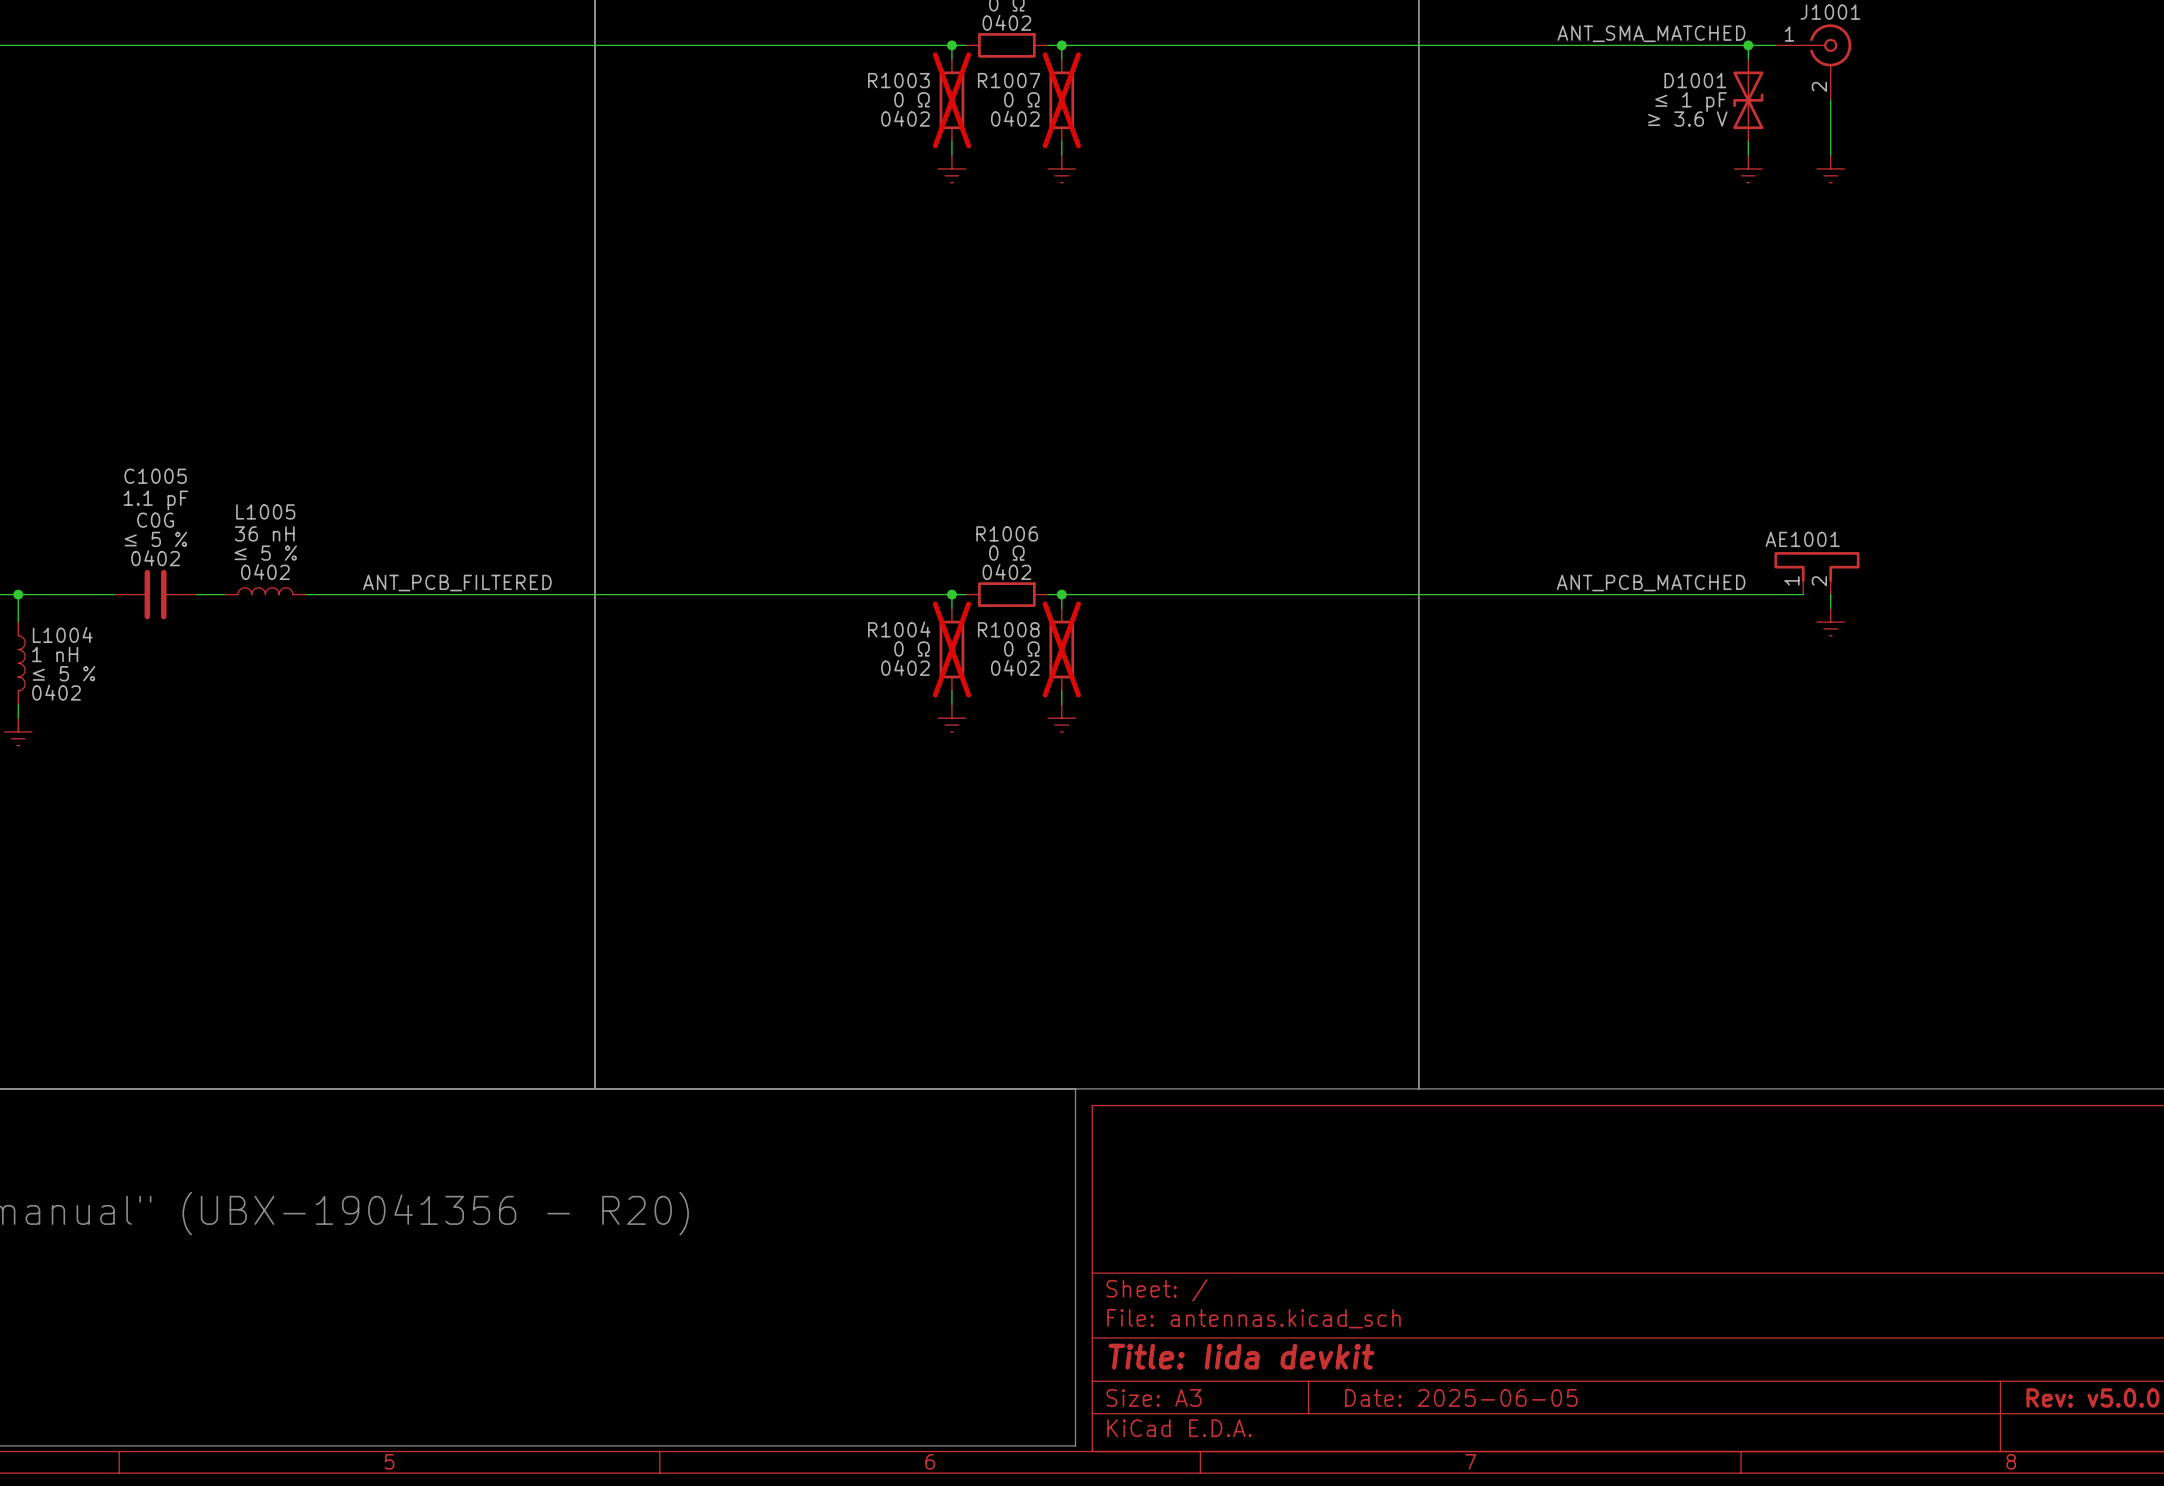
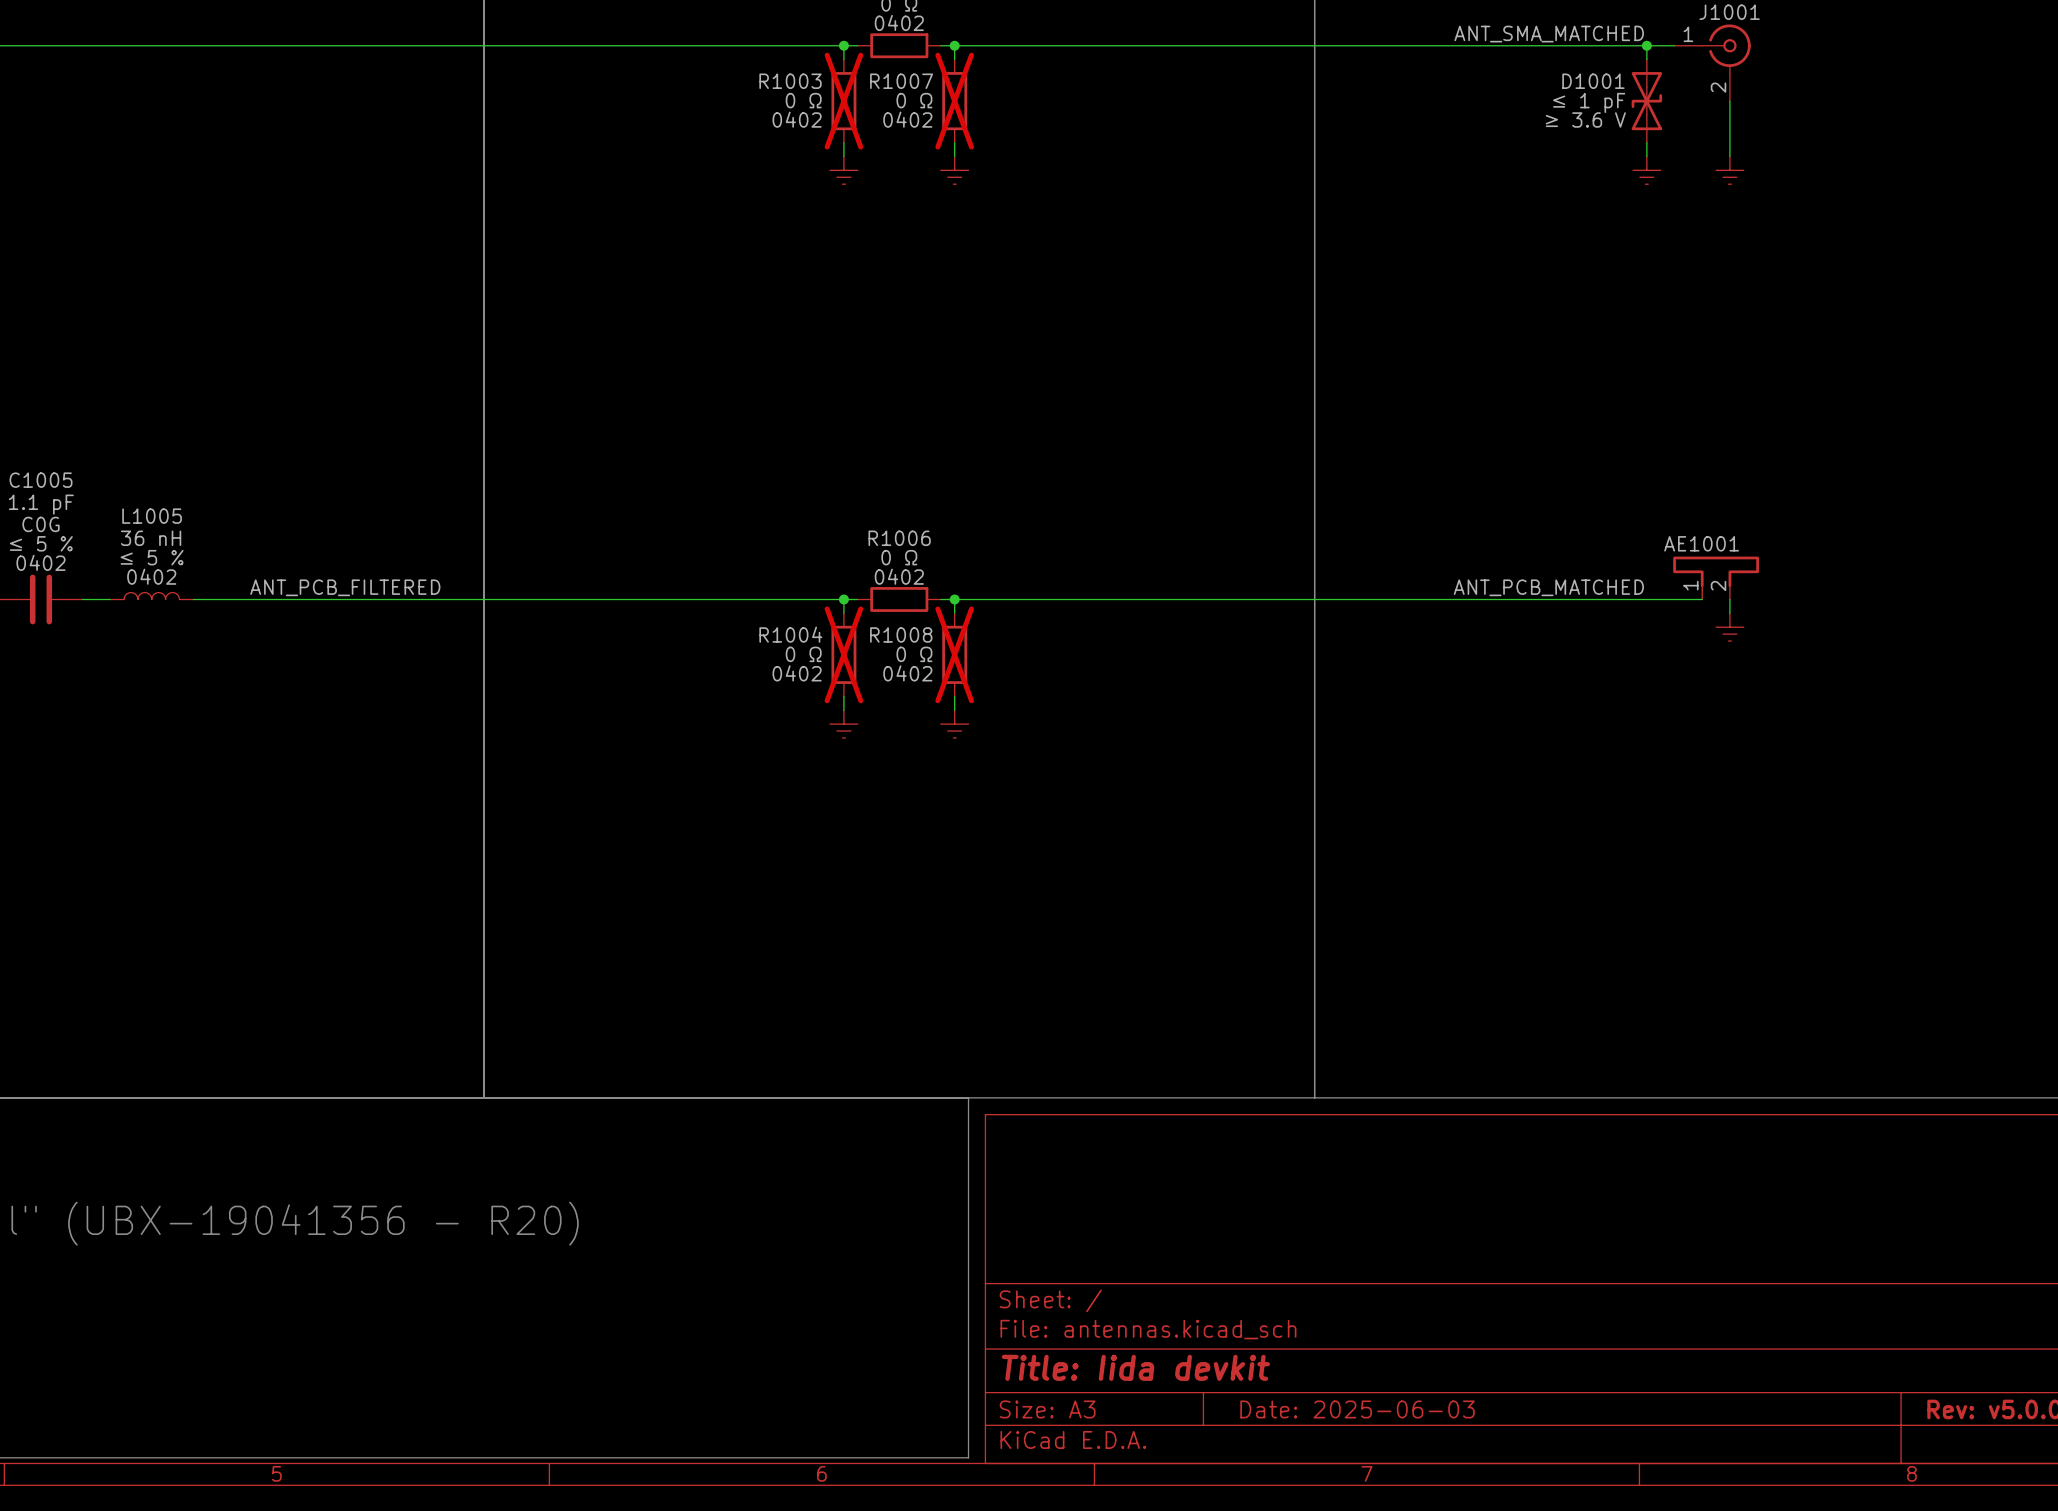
title block: Date: 2025-06-05 (1461, 1397) -> Date: 2025-06-03 (1357, 1409)

